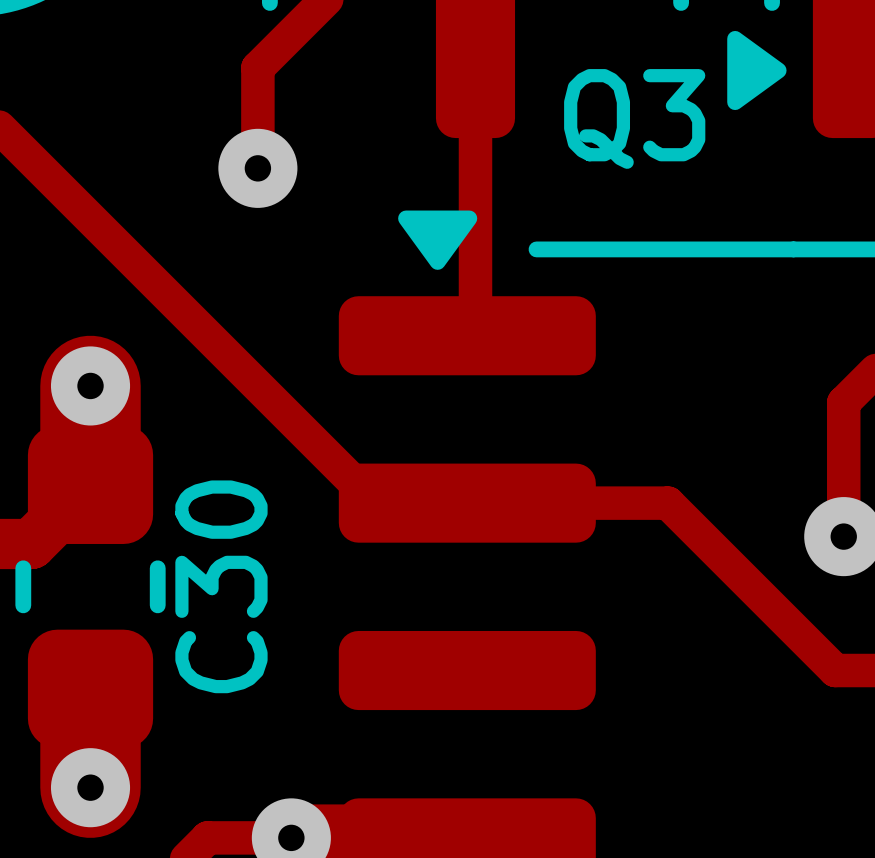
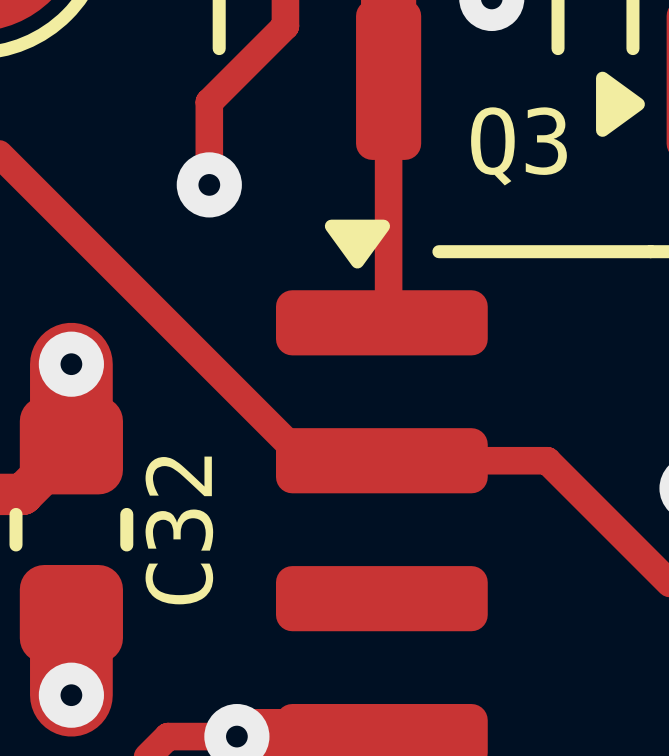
C30 name: C30 (221, 586) -> C32 (179, 530)

